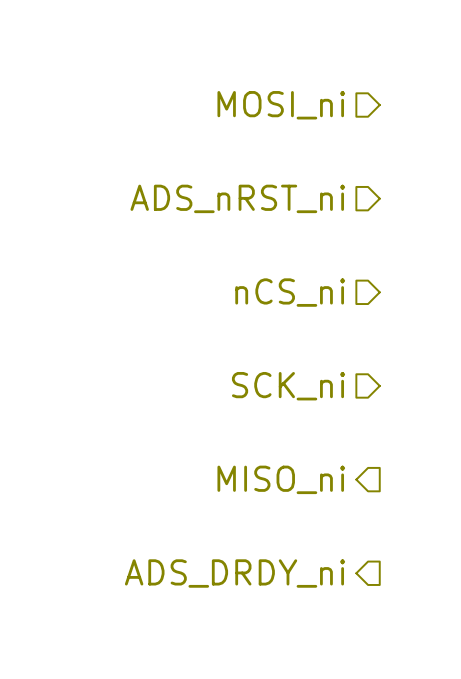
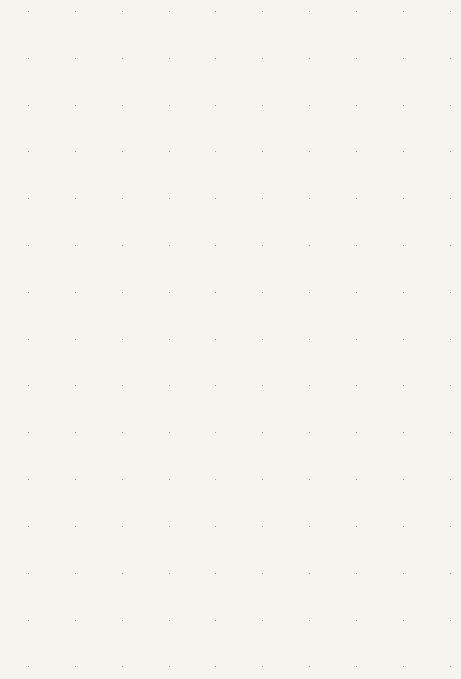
hierarchical label: MOSI_ni (281, 105) -> none
hierarchical label: ADS_nRST_ni (237, 198) -> none
hierarchical label: nCS_ni (290, 292) -> none
hierarchical label: SCK_ni (288, 386) -> none
hierarchical label: MISO_ni (281, 479) -> none
hierarchical label: ADS_DRDY_ni (235, 573) -> none

